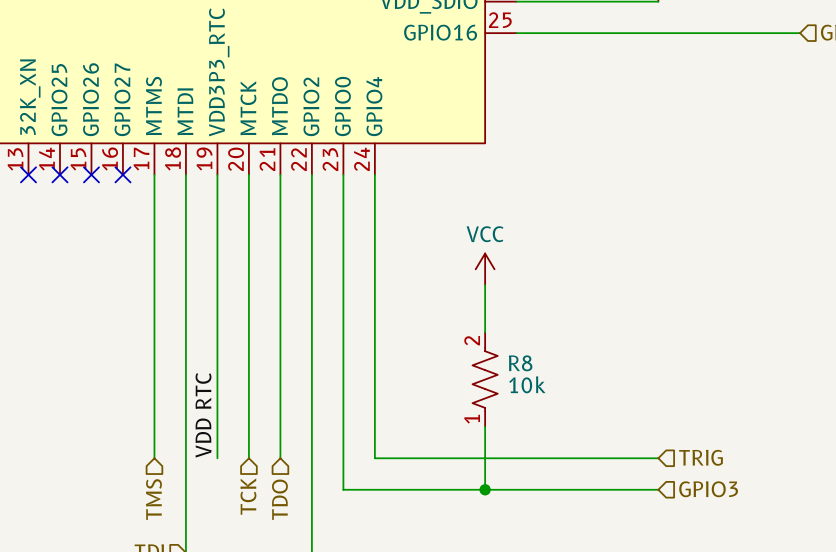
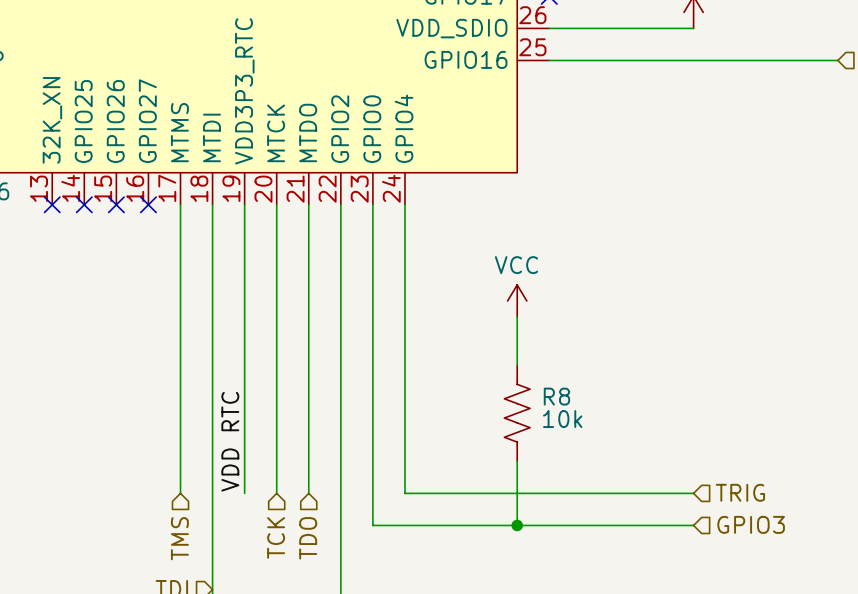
R8 pin number: 2 (472, 340) -> none
R8 pin number: 1 (472, 419) -> none

